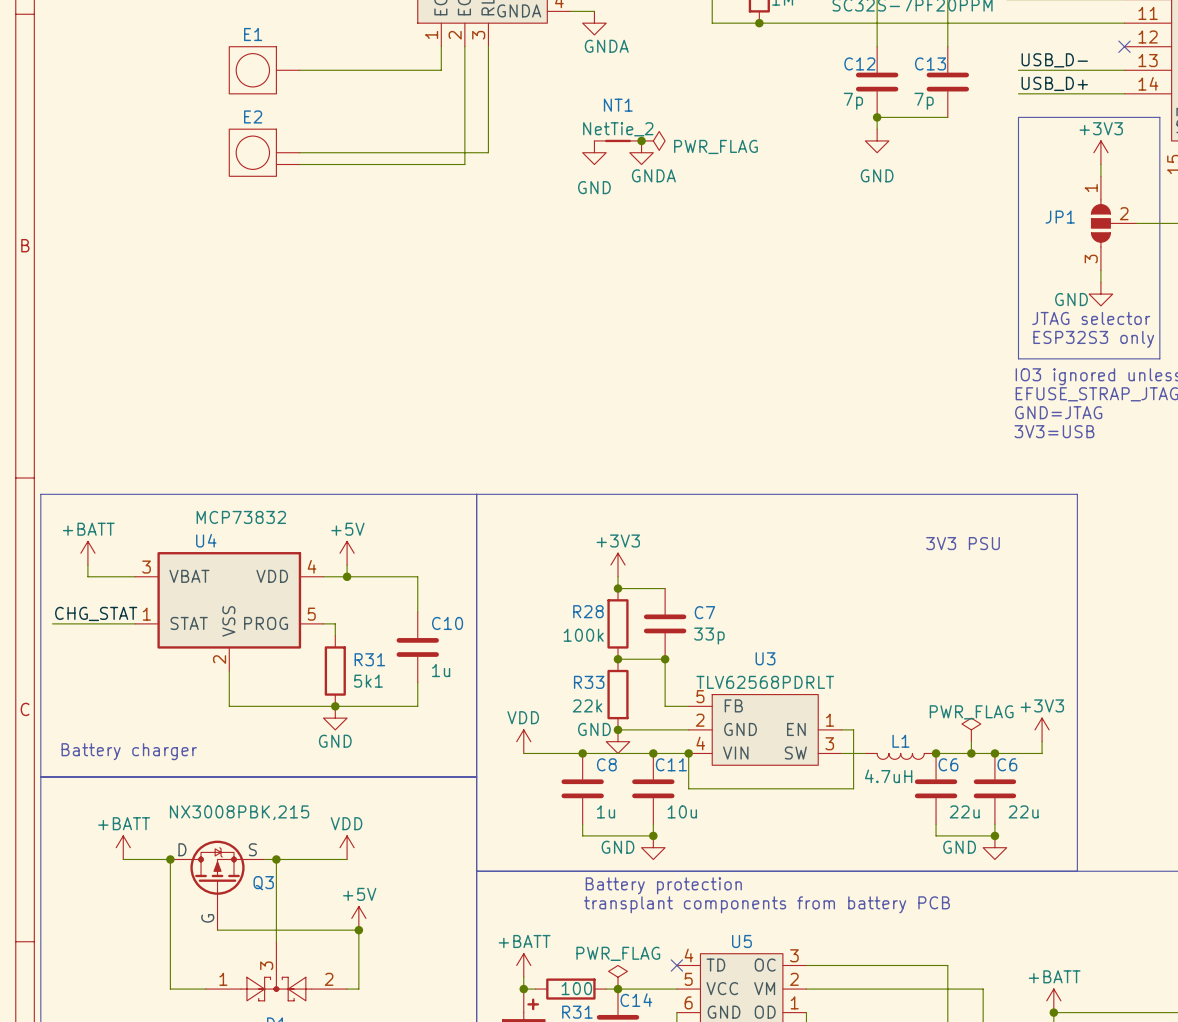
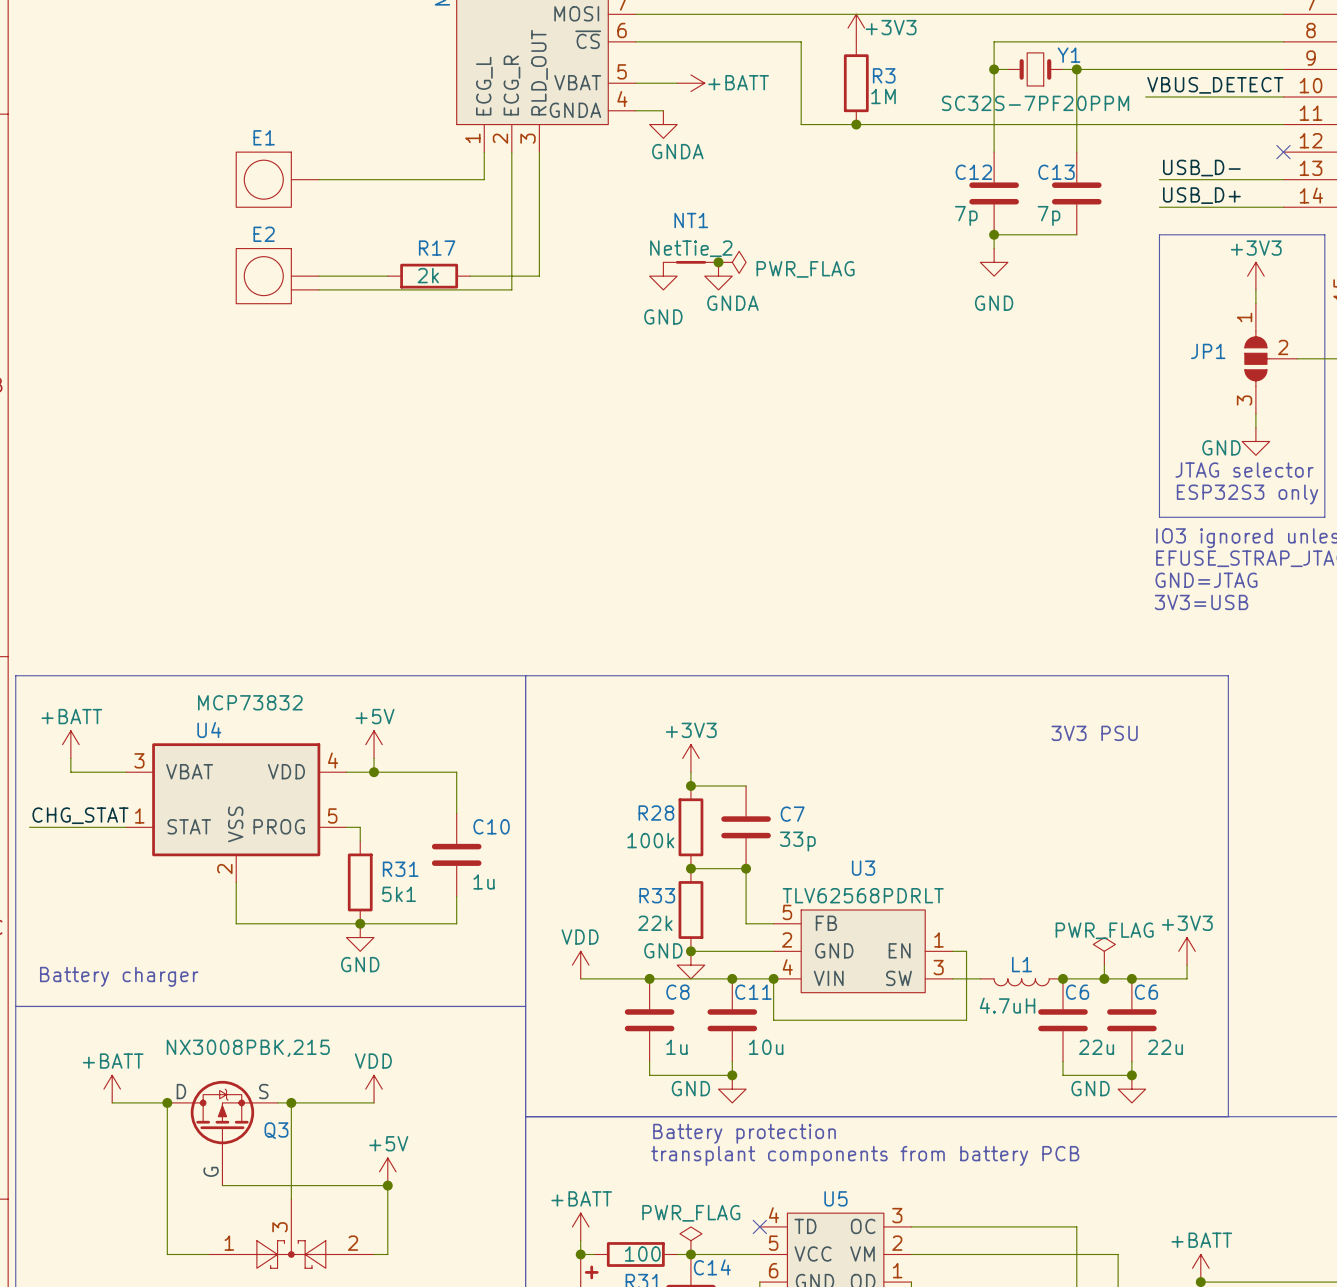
wire: (358, 152) (429, 152) -> none
R17: none -> 2k (429, 276)

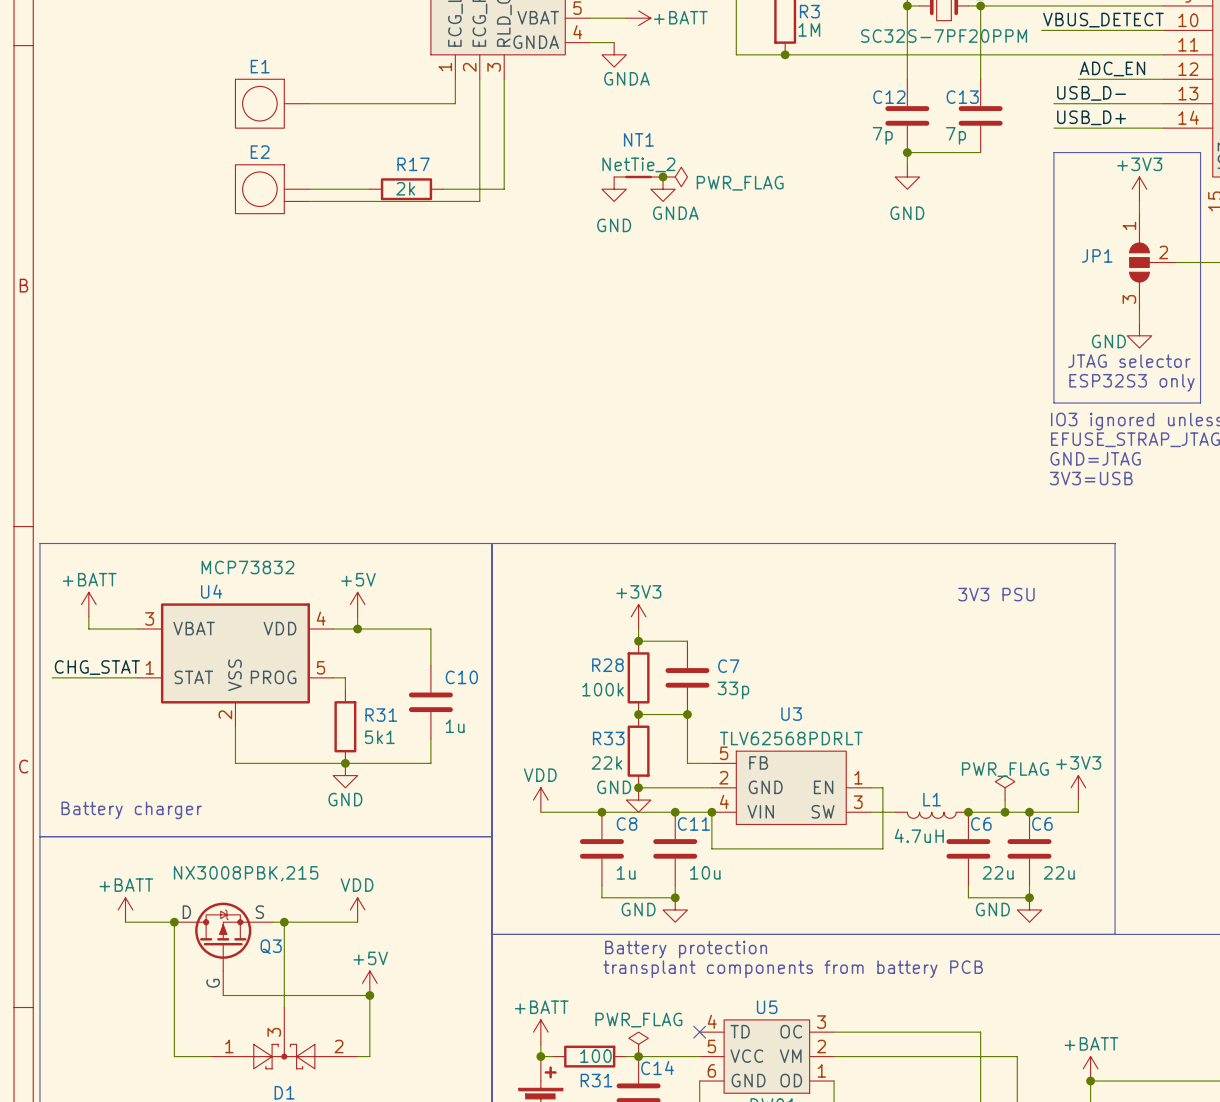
label: none -> ADC_EN (1112, 68)
wire: none -> (1078, 79) (1163, 79)
no-connect mark: (1283, 152) -> none

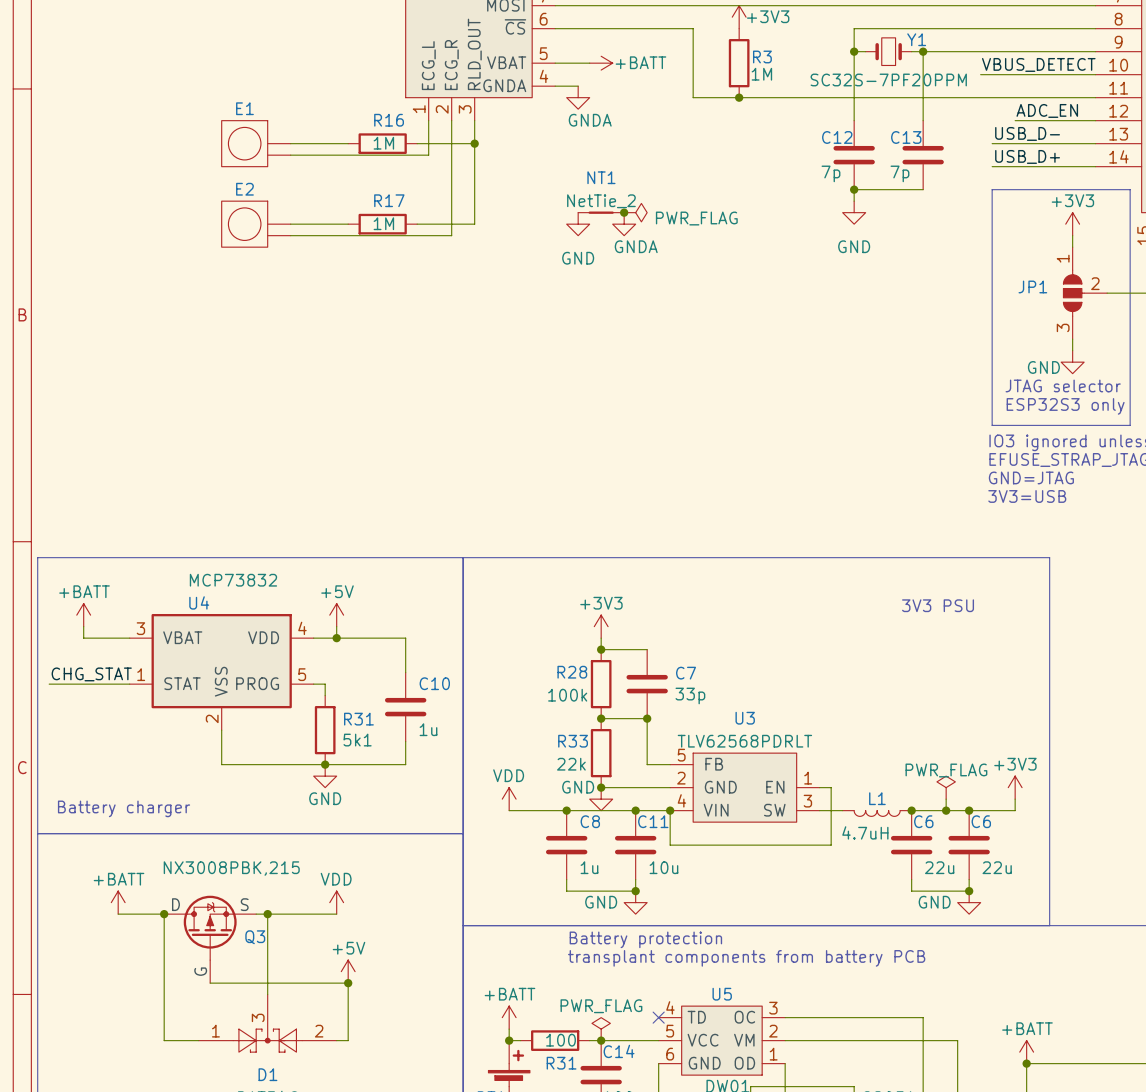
E1 symbol: [235, 79, 309, 129] -> [221, 120, 291, 167]
wire: (369, 103) (443, 103) -> none
R16: none -> 1M (382, 143)
wire: none -> (474, 143) (428, 143) (428, 155) (290, 155)
junction: none -> (474, 143)
R17 value: 2k (405, 188) -> 1M (383, 223)

